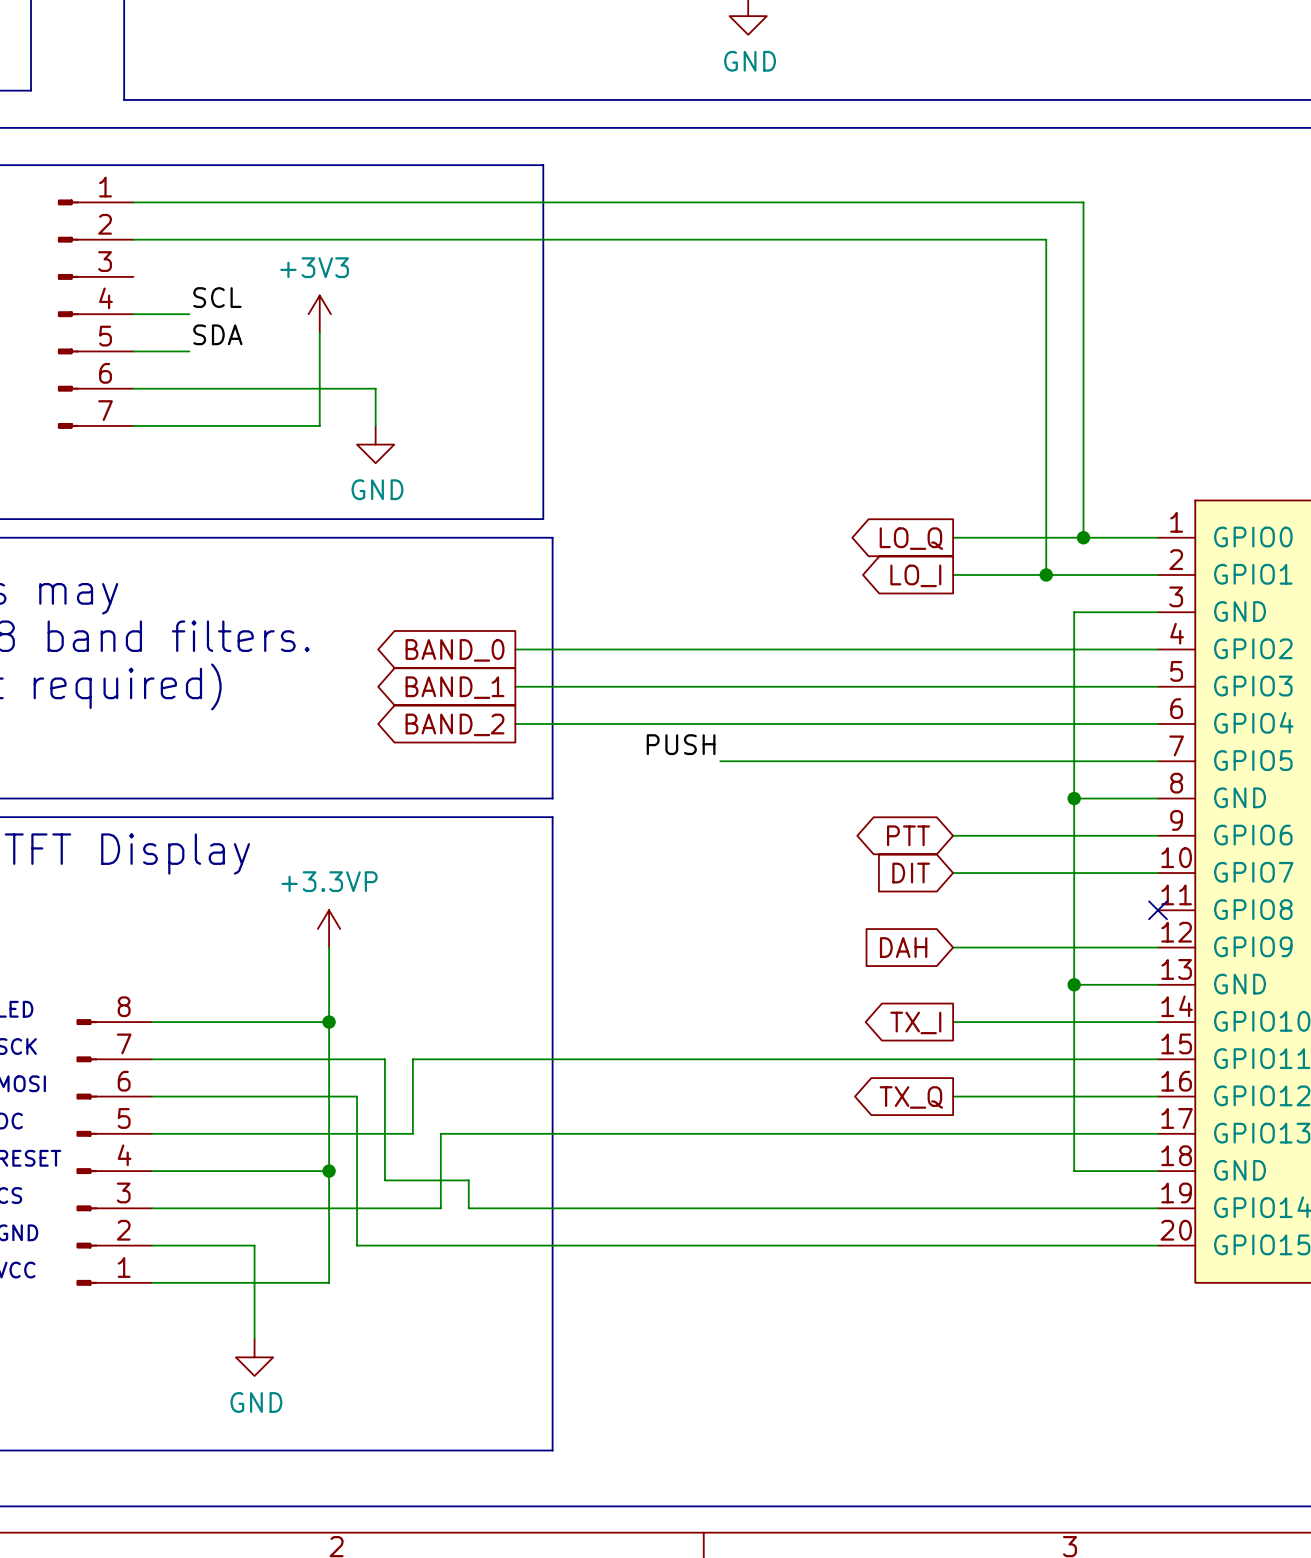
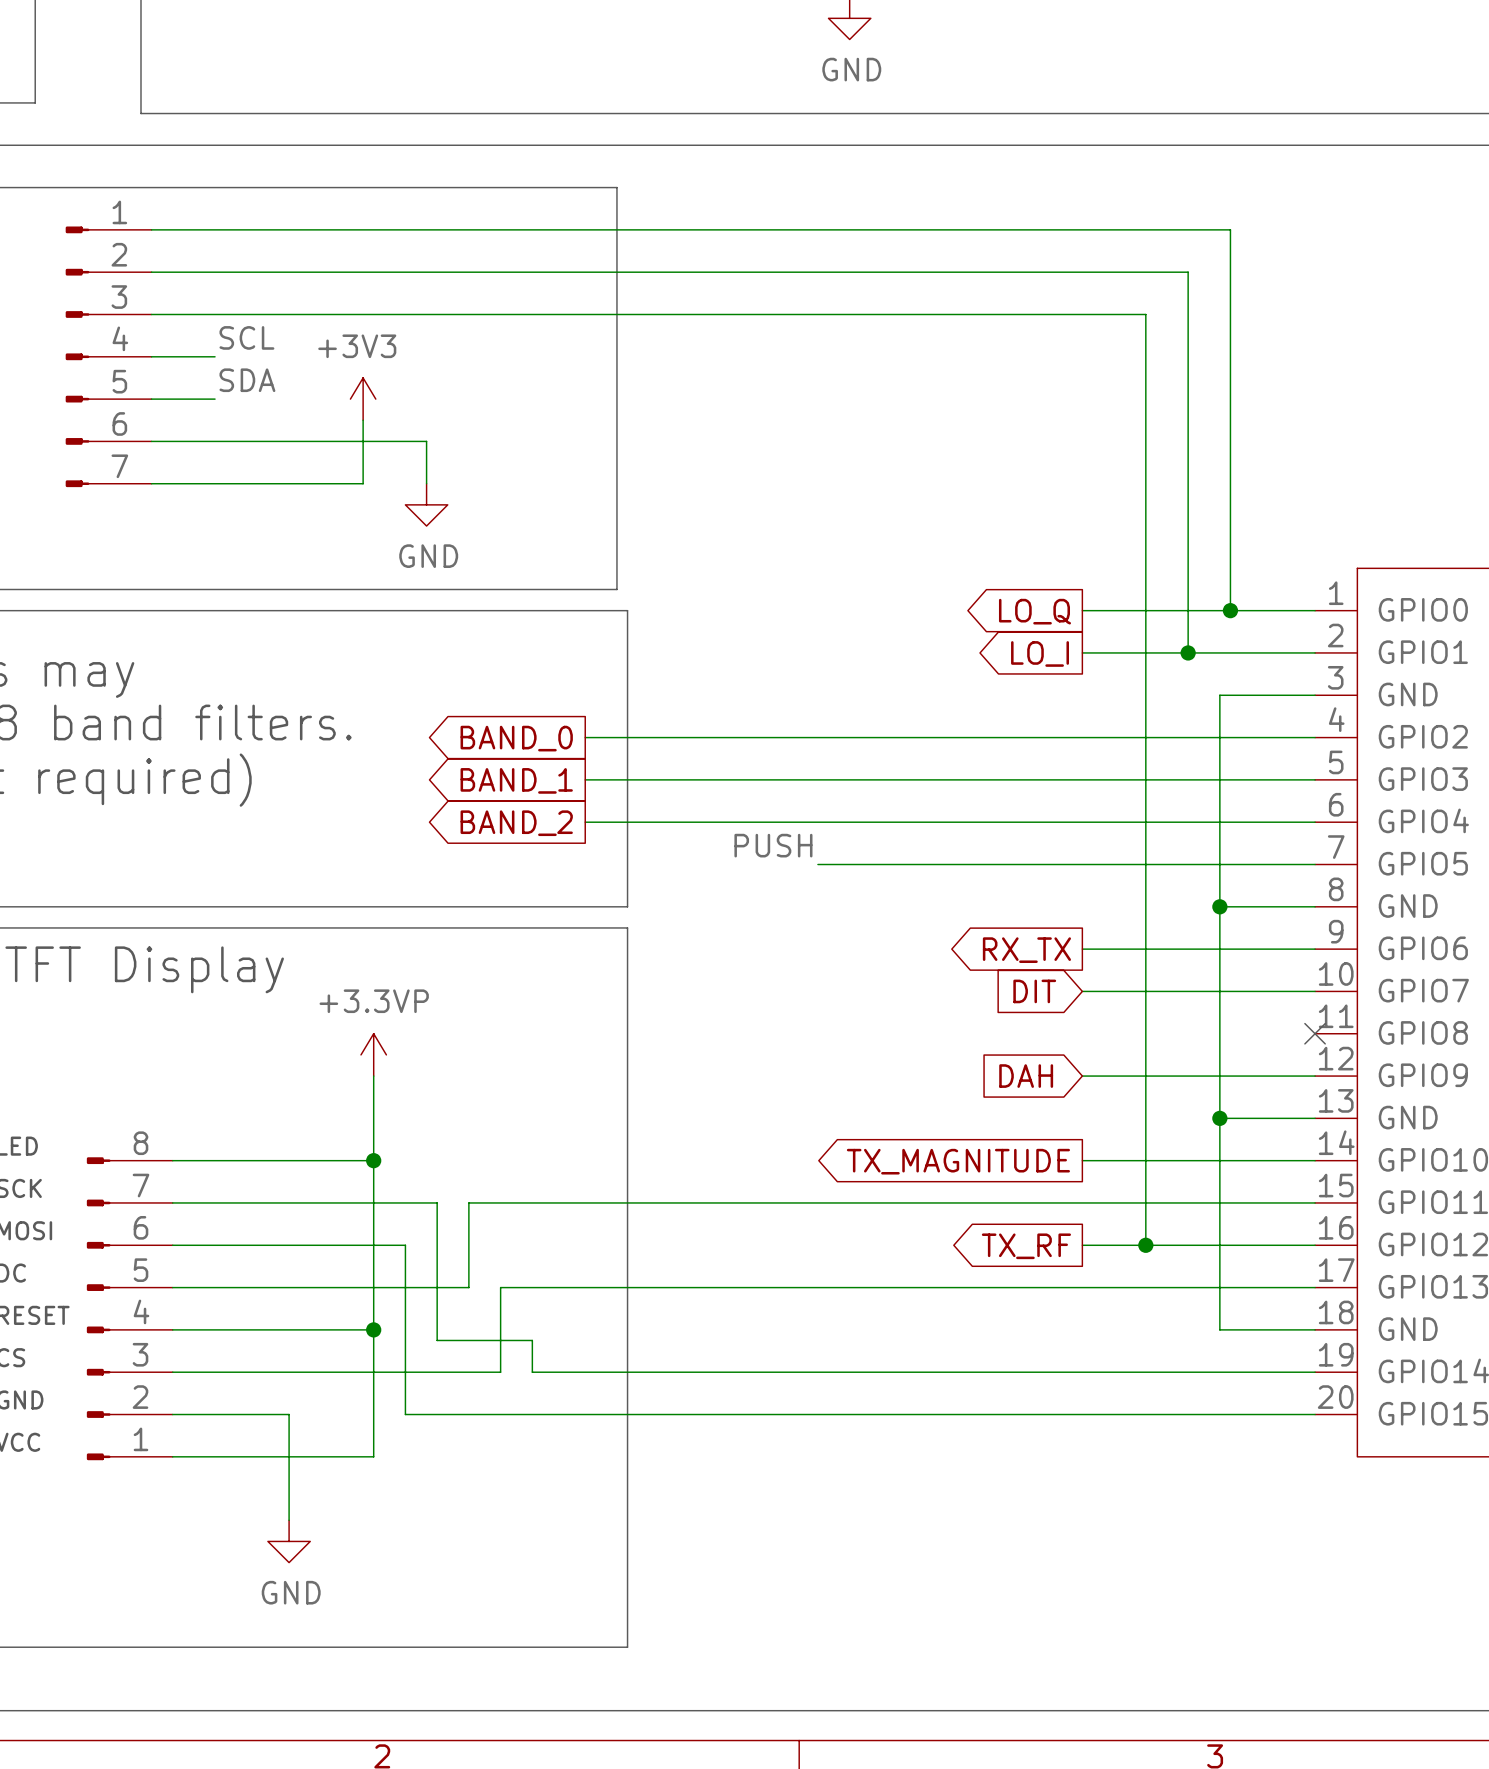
wire: none -> (151, 314) (1145, 314) (1145, 1245)
power symbol position: +3V3 (319, 314) -> +3V3 (363, 399)
global label shape: bidirectional (908, 835) -> output (1026, 950)
global label: PTT (908, 835) -> RX_TX (1026, 950)
global label: TX_I (915, 1022) -> TX_MAGNITUDE (958, 1161)
junction: none -> (1145, 1245)
global label: TX_Q (911, 1097) -> TX_RF (1026, 1246)

